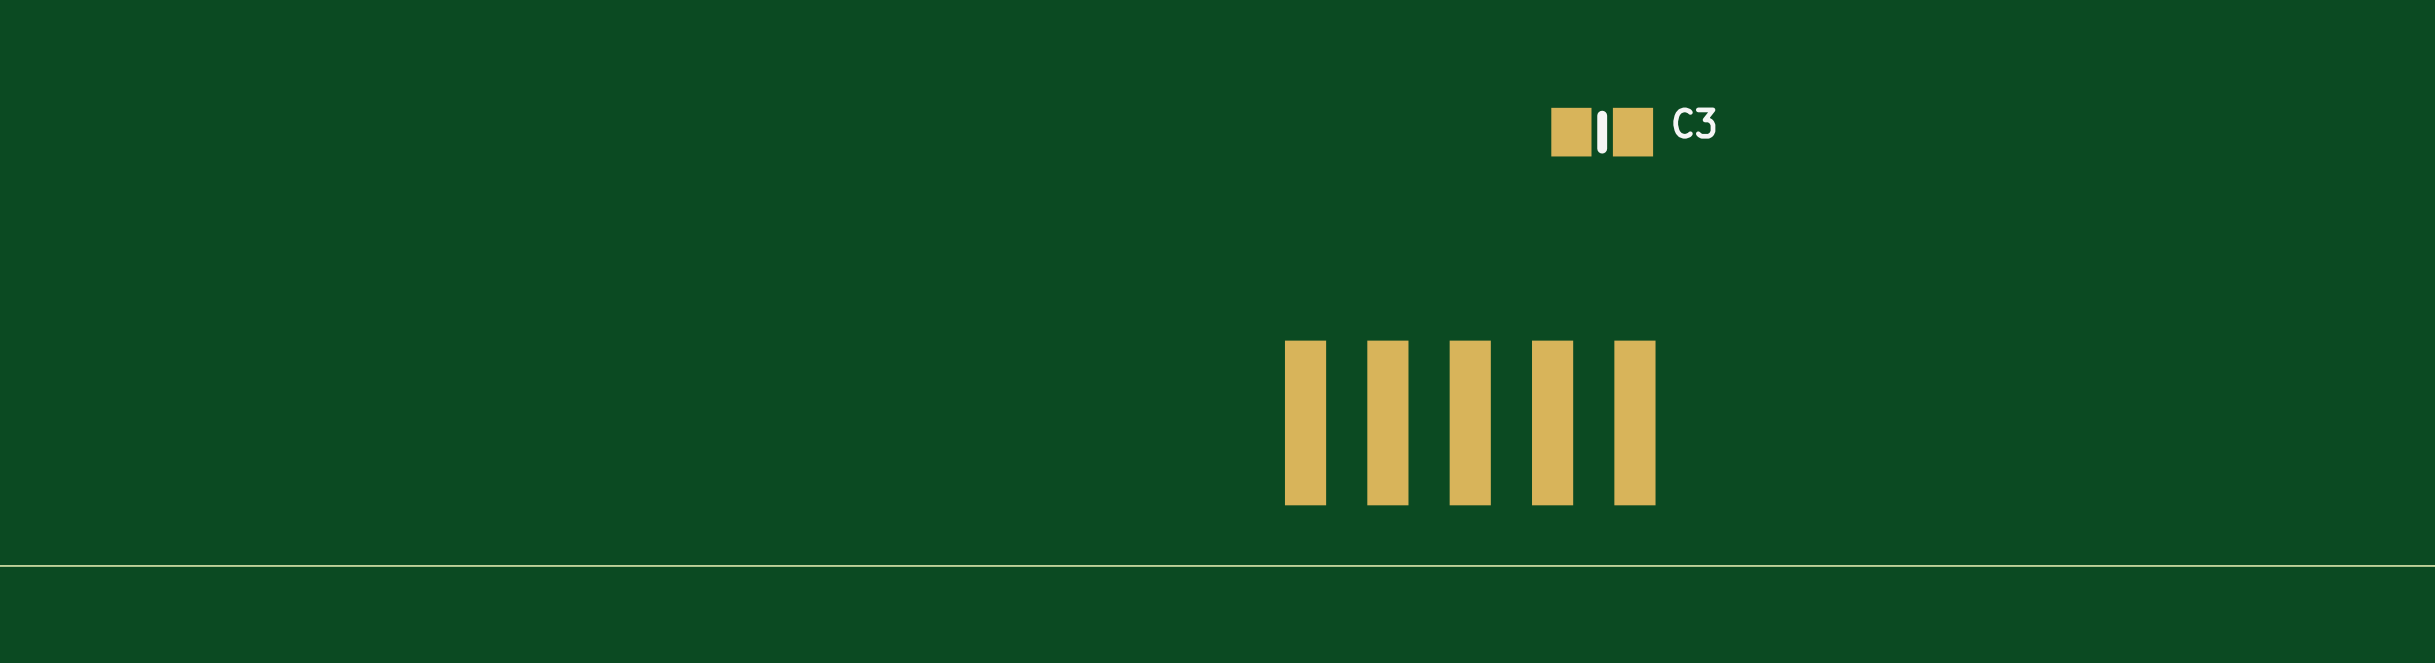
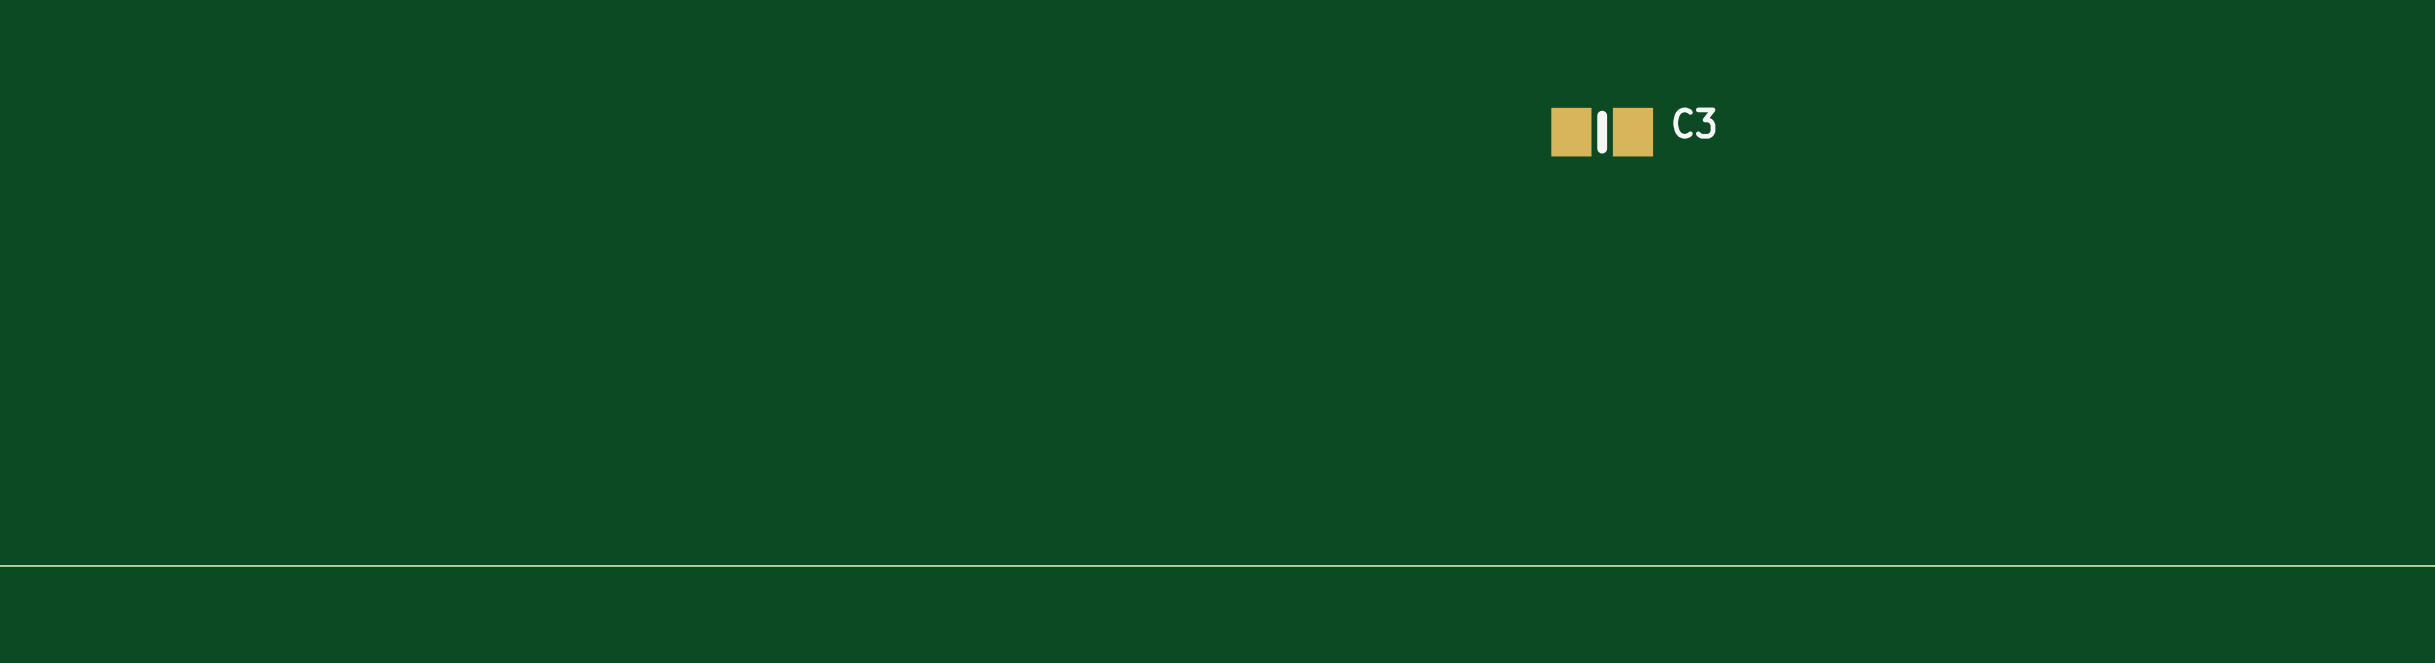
part: (1470, 422) -> none

